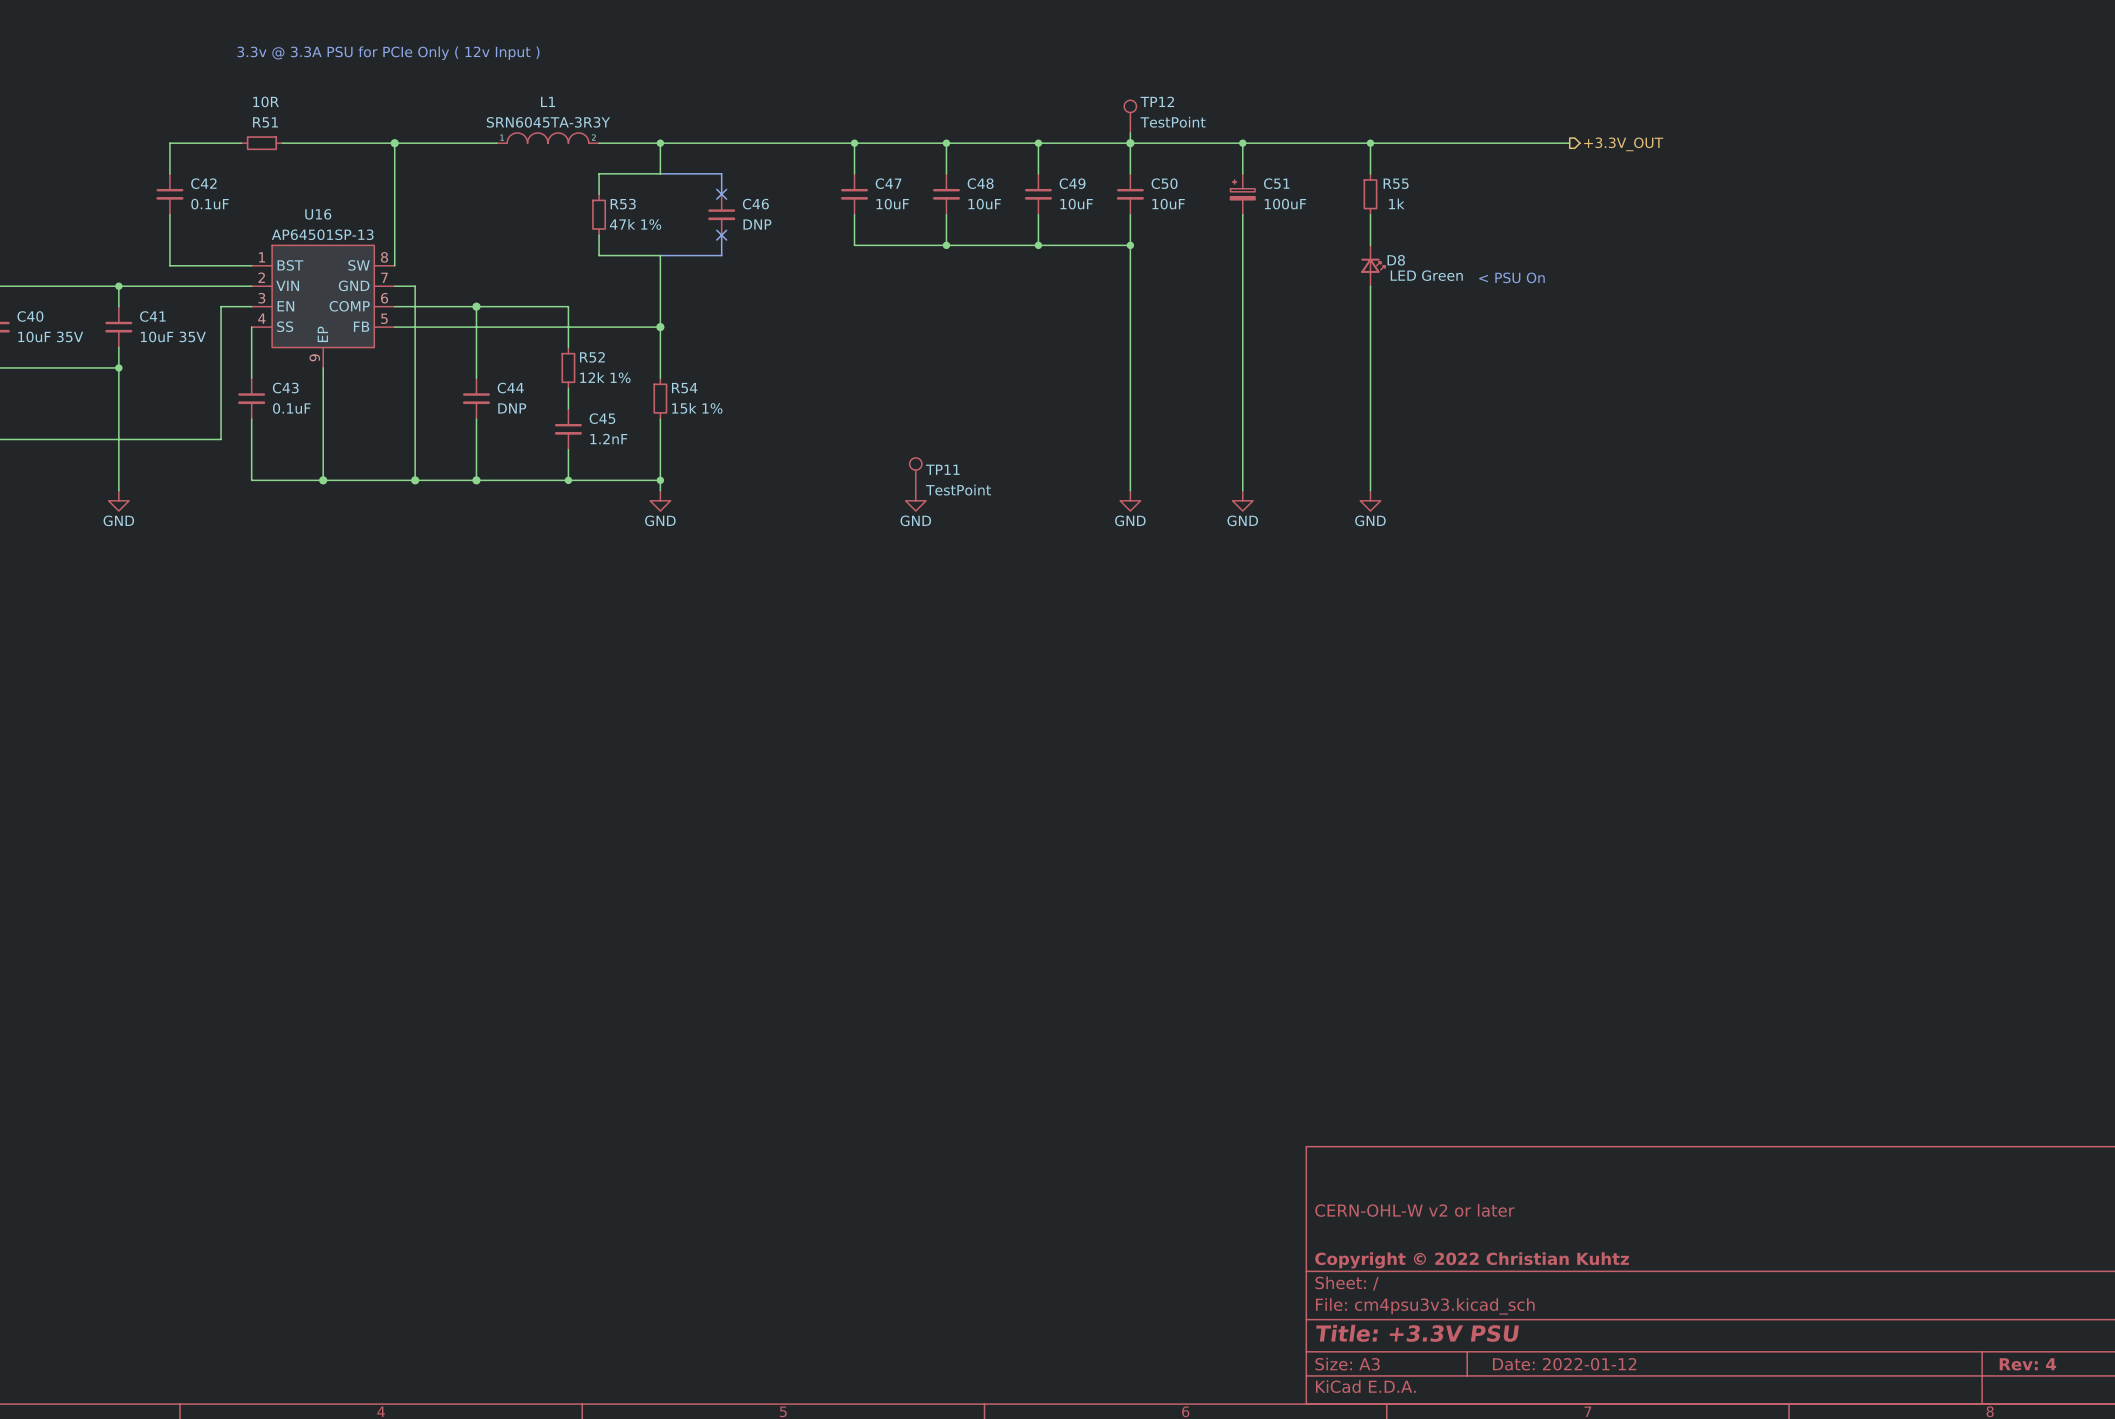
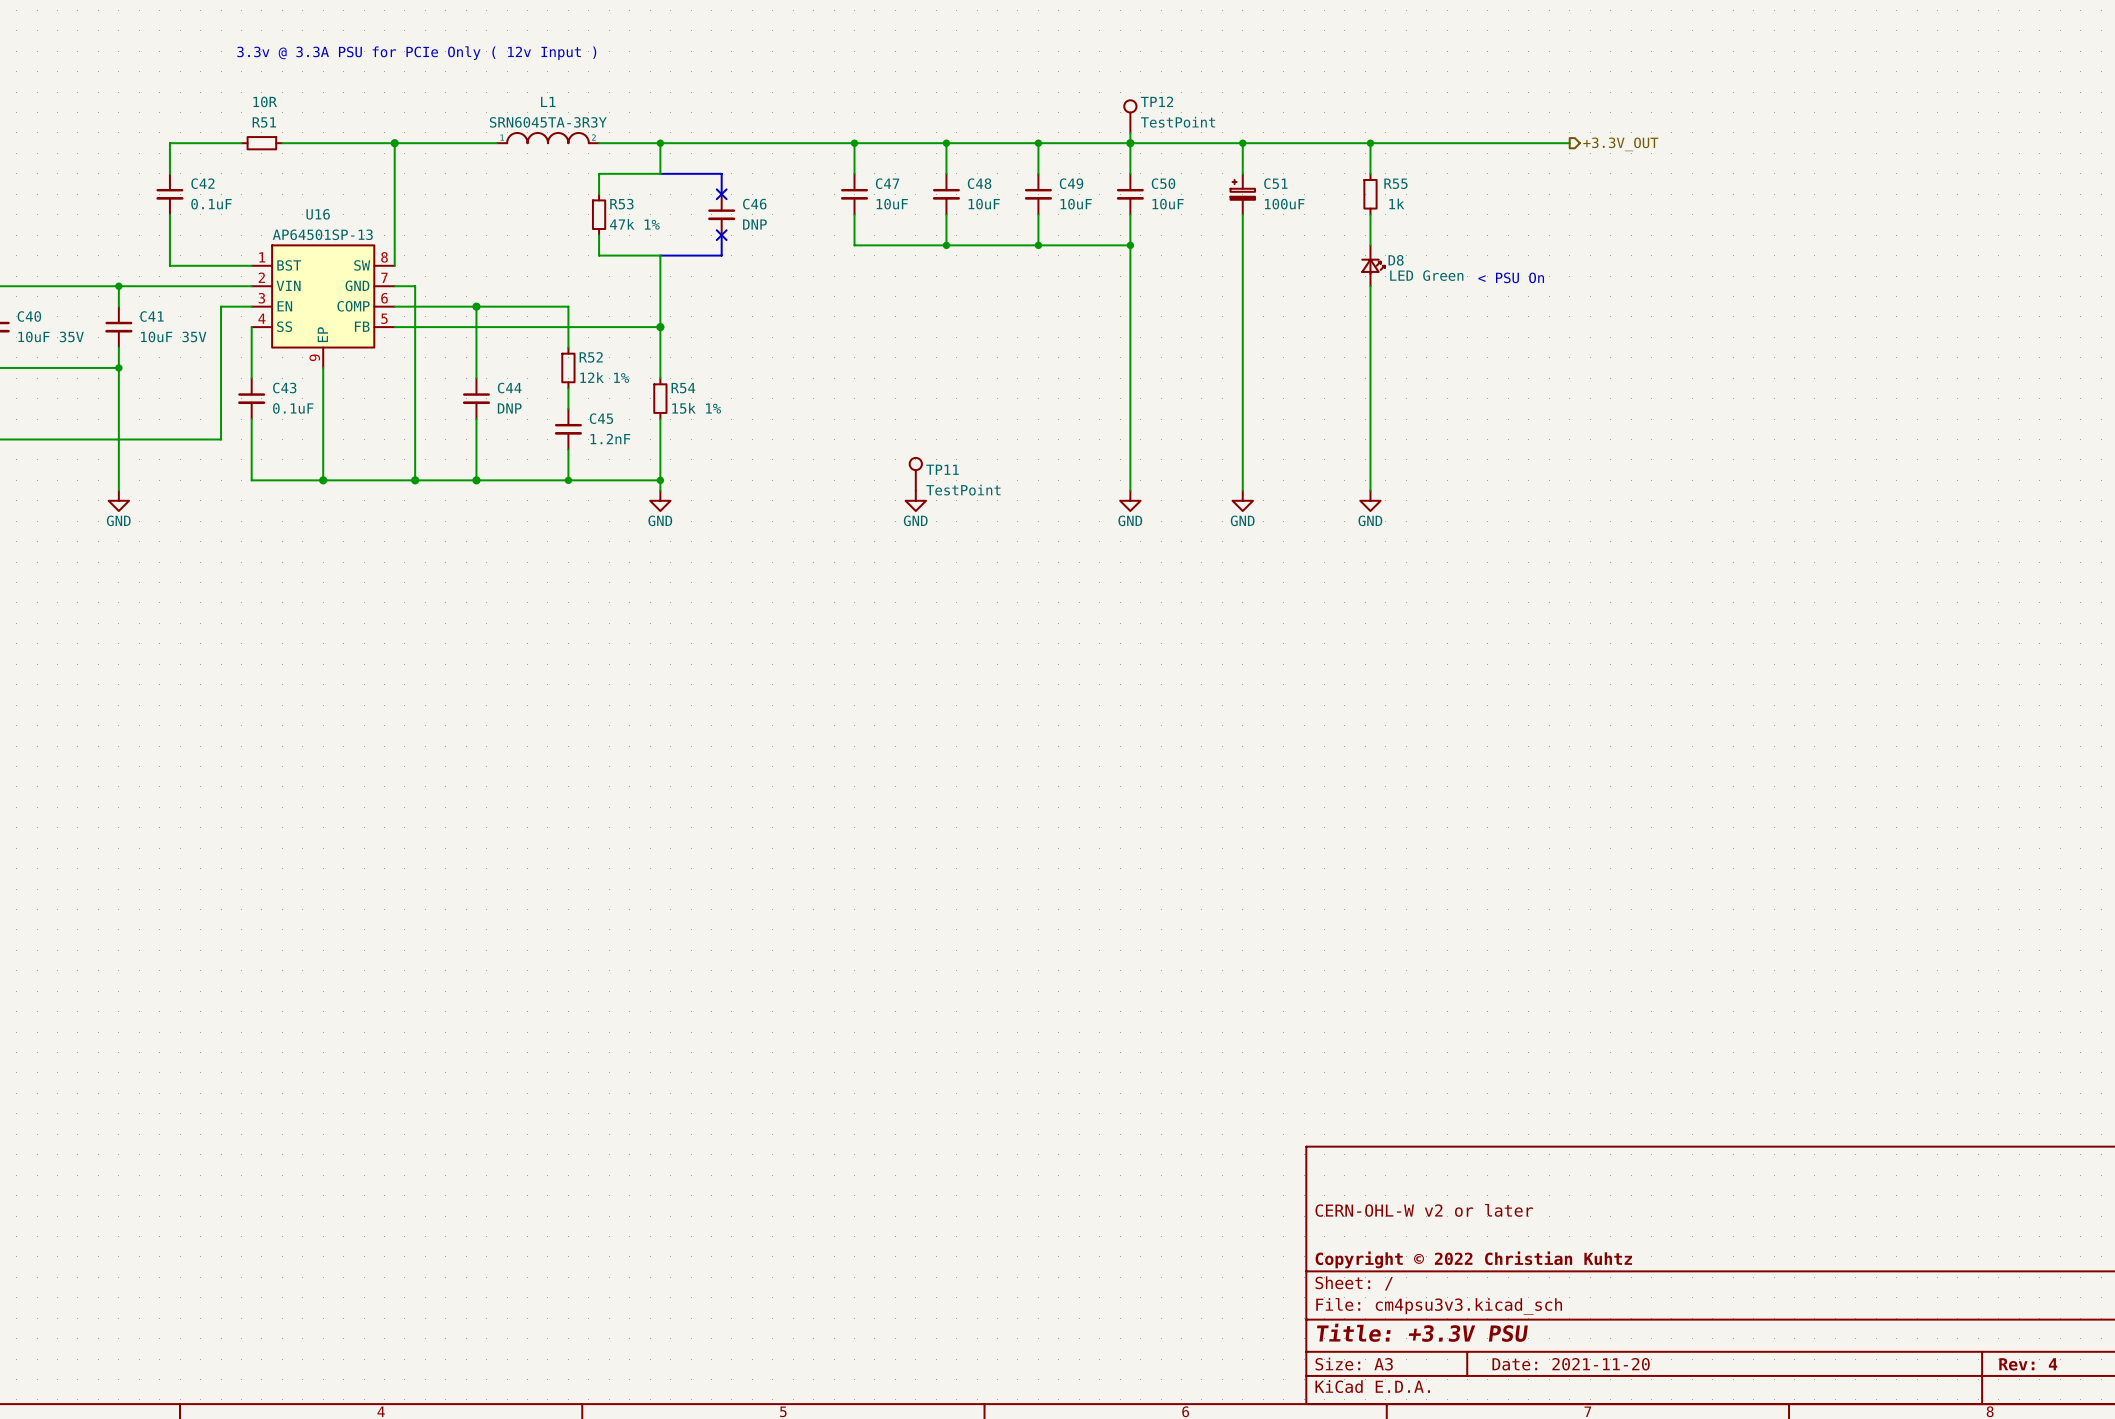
title block: Date: 2022-01-12 (1564, 1364) -> Date: 2021-11-20 (1571, 1364)

